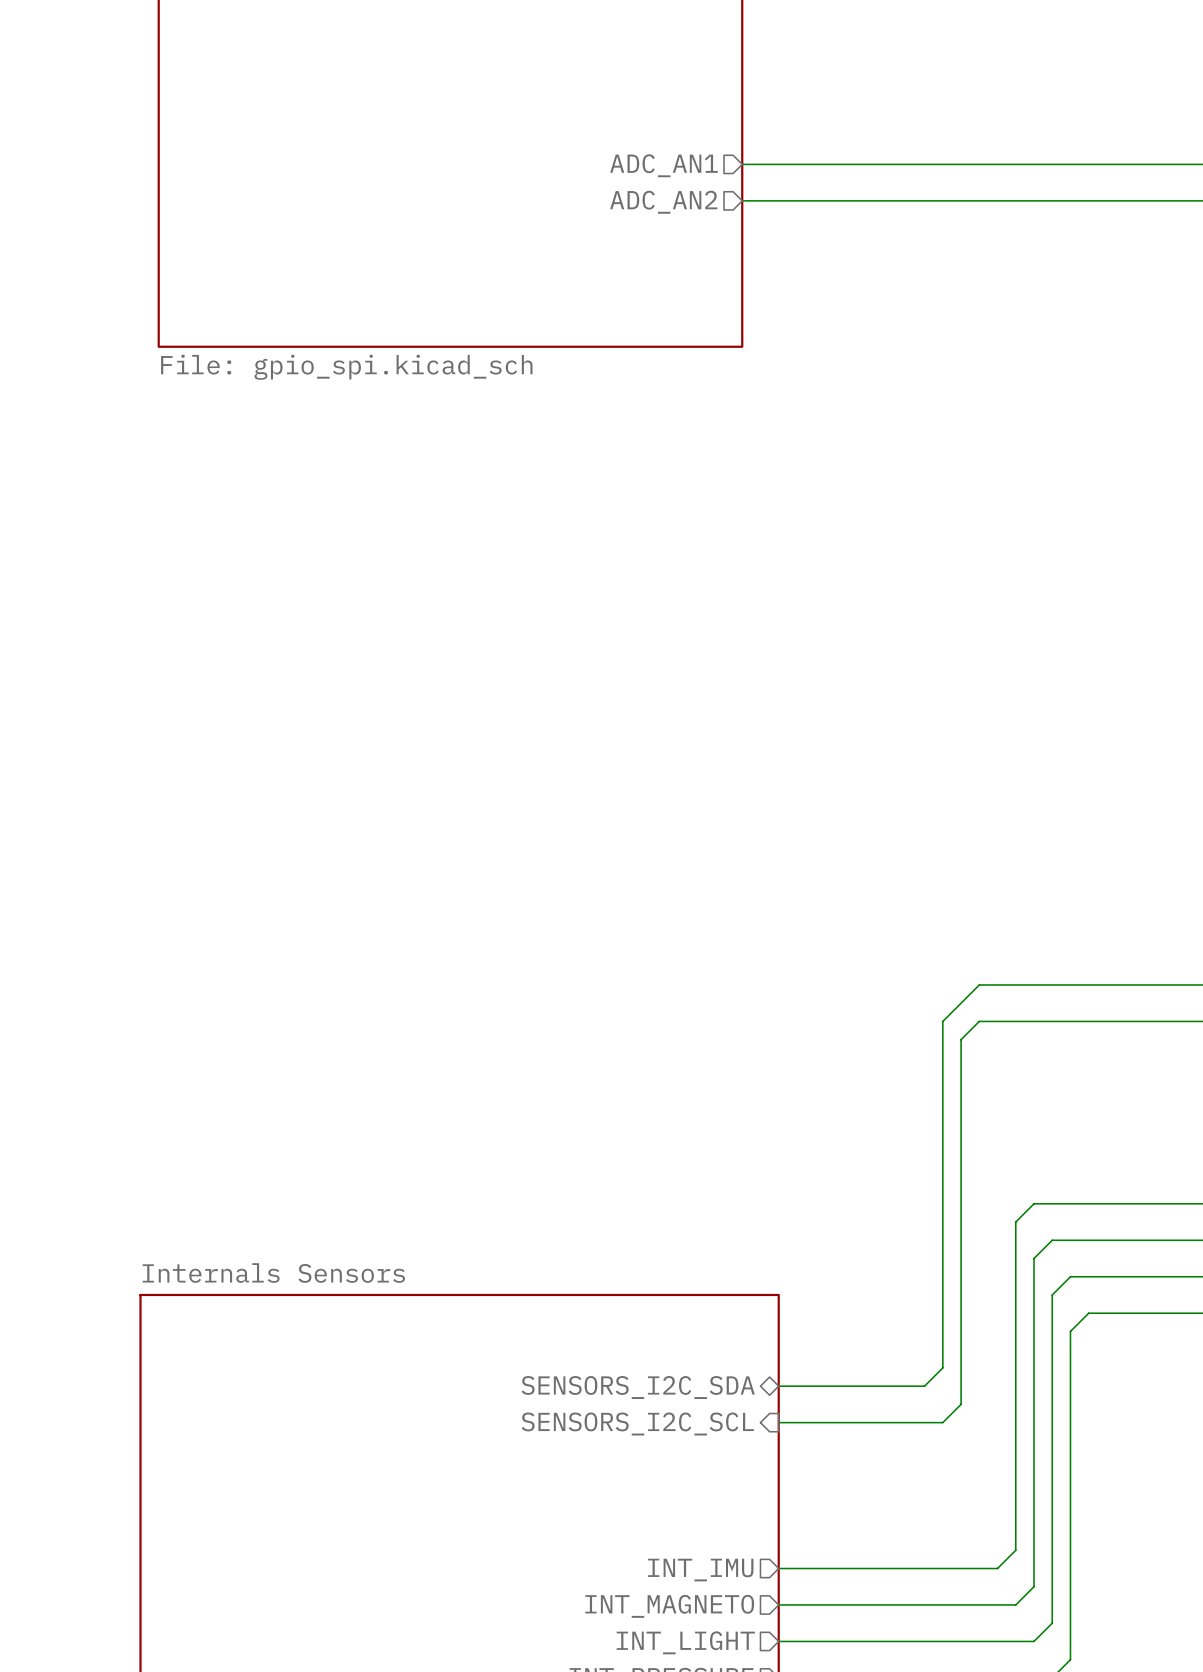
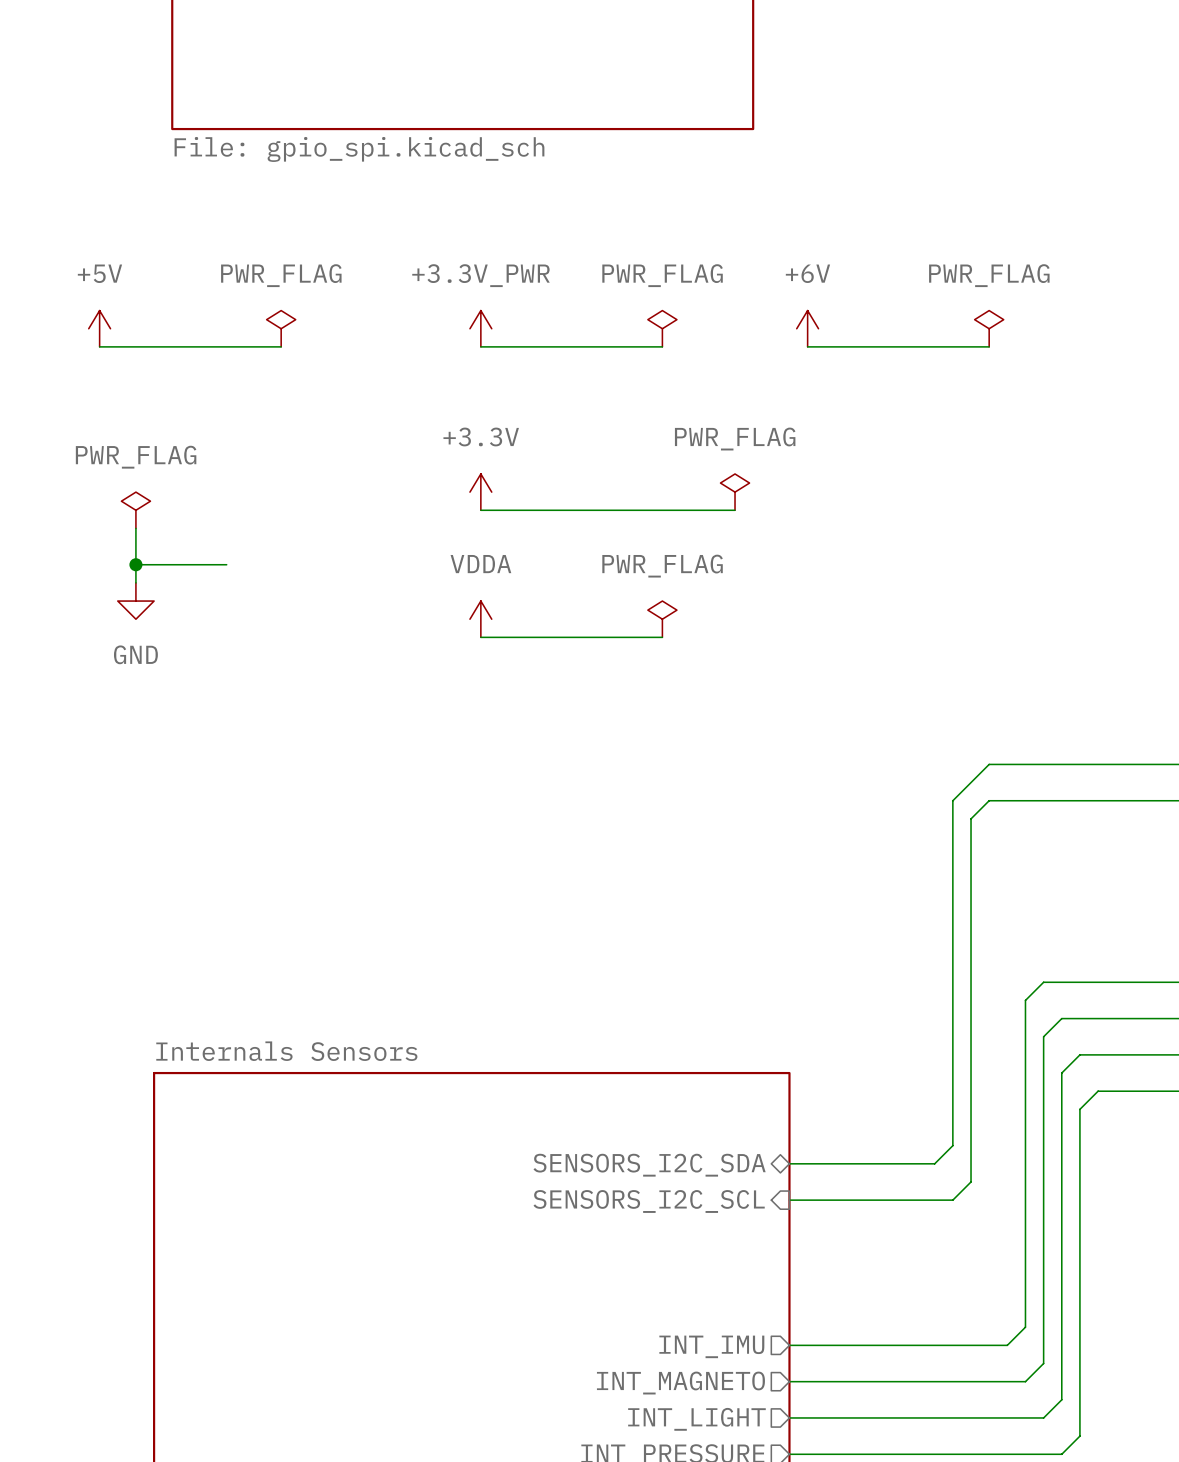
power symbol: none -> +5V (99, 328)
power symbol: none -> PWR_FLAG (281, 328)
power symbol: none -> +3.3V_PWR (480, 328)
power symbol: none -> PWR_FLAG (662, 328)
power symbol: none -> +6V (807, 328)
power symbol: none -> PWR_FLAG (989, 328)
wire: none -> (99, 346) (281, 346)
wire: none -> (480, 346) (662, 346)
wire: none -> (807, 346) (989, 346)
power symbol: none -> +3.3V (480, 492)
power symbol: none -> PWR_FLAG (735, 492)
power symbol: none -> PWR_FLAG (135, 510)
wire: none -> (480, 510) (735, 510)
wire: none -> (135, 528) (135, 582)
wire: none -> (135, 564) (226, 564)
junction: none -> (135, 564)
power symbol: none -> GND (135, 601)
power symbol: none -> VDDA (480, 619)
power symbol: none -> PWR_FLAG (662, 619)
wire: none -> (480, 637) (662, 637)

